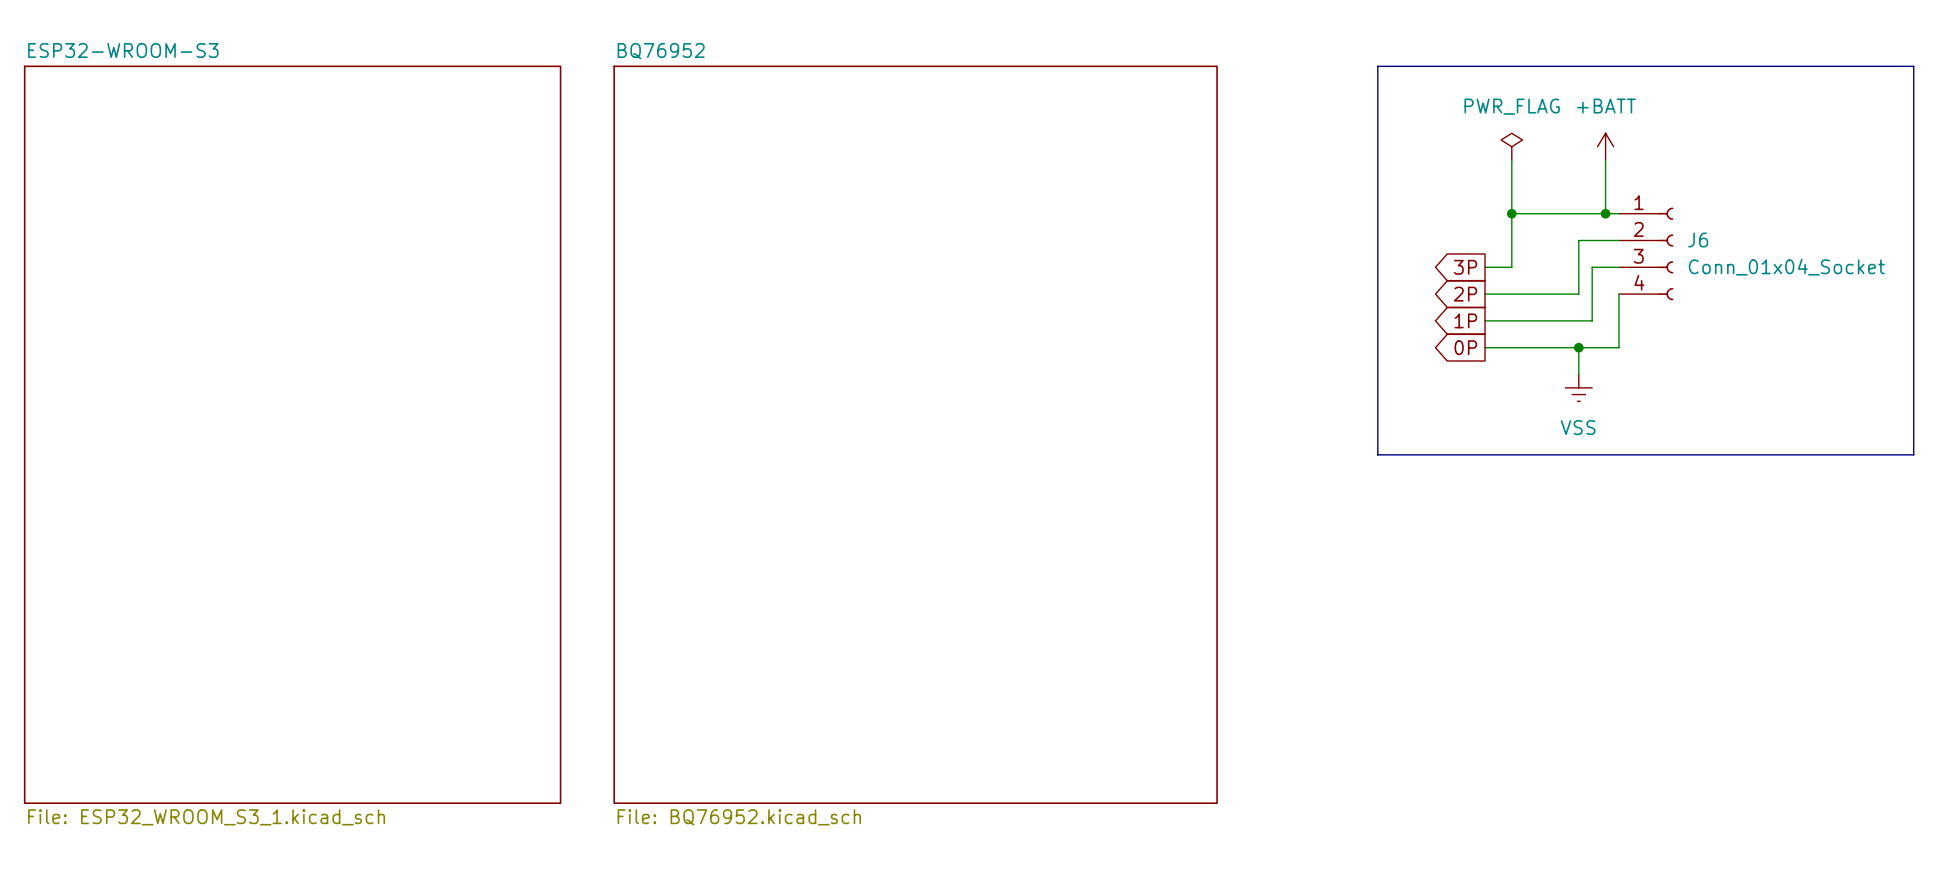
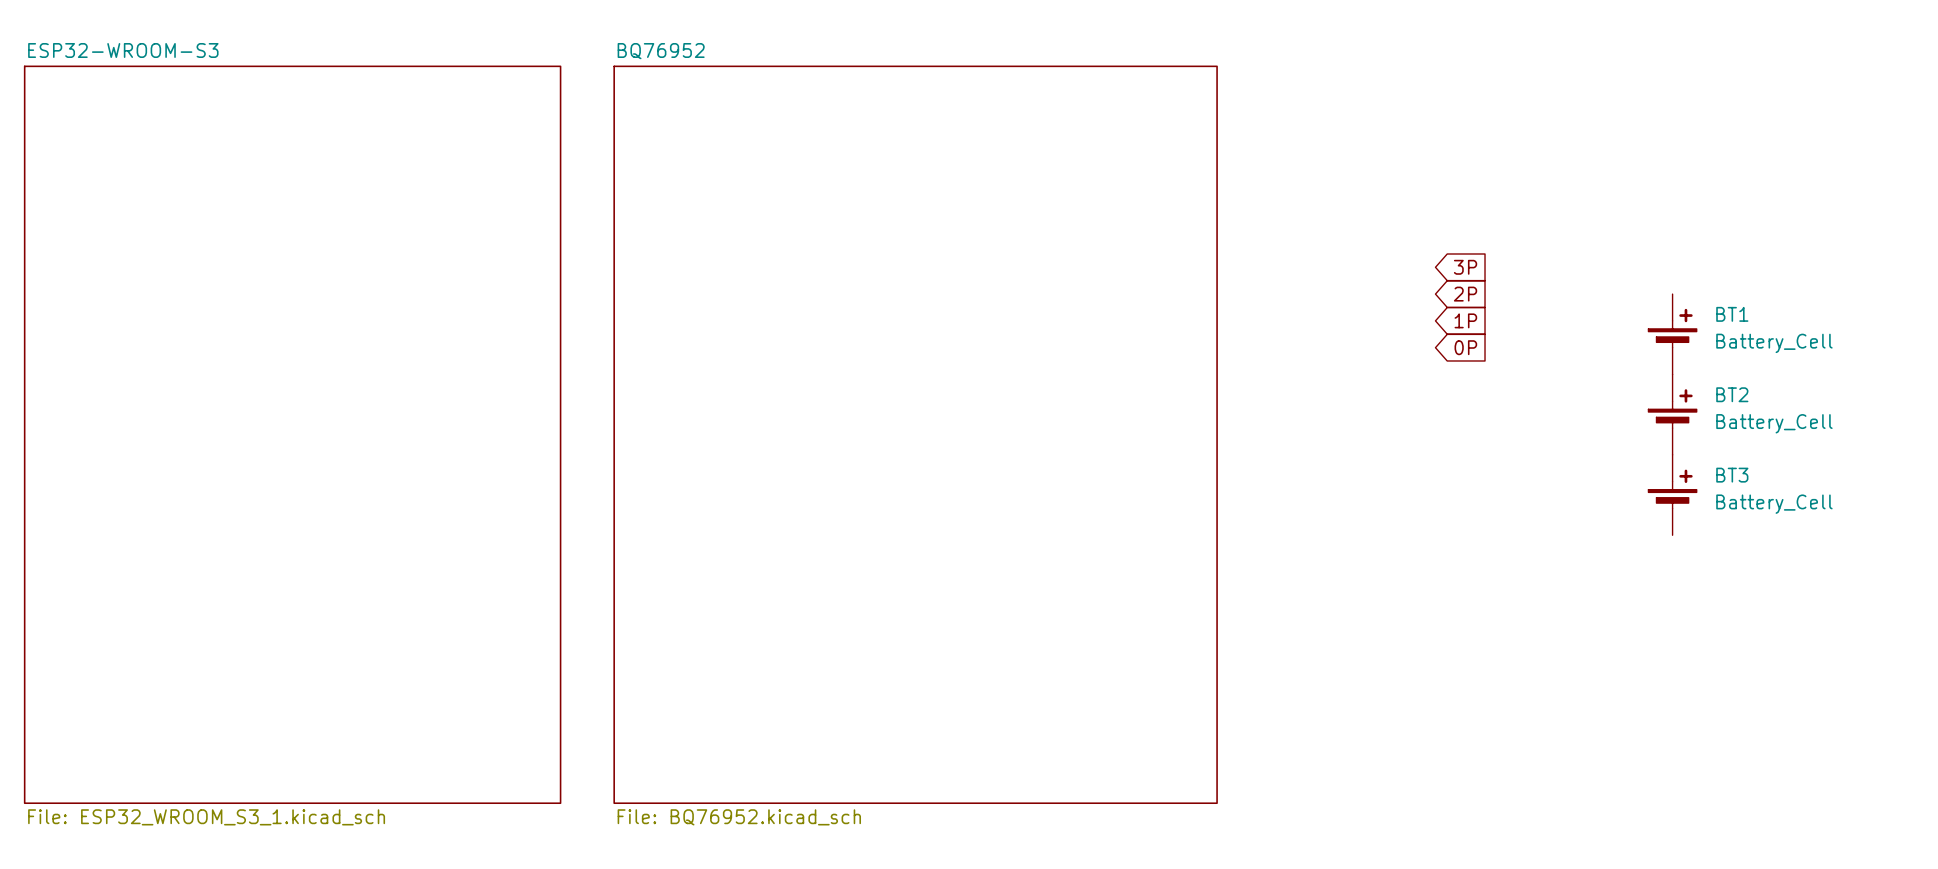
line: (1377, 66) (1913, 66) (1913, 454) (1377, 454) (1377, 66) -> none
power symbol: PWR_FLAG (1511, 146) -> none
power symbol: +BATT (1605, 146) -> none
wire: (1511, 160) (1511, 267) (1485, 267) -> none
wire: (1605, 160) (1605, 213) -> none
wire: (1511, 213) (1618, 213) -> none
junction: (1511, 213) -> none
junction: (1605, 213) -> none
wire: (1618, 240) (1578, 240) (1578, 294) (1485, 294) -> none
J6: Conn_01x04_Socket (1646, 253) -> none
wire: (1618, 267) (1592, 267) (1592, 320) (1485, 320) -> none
wire: (1618, 294) (1618, 347) (1485, 347) -> none
BT1: none -> Battery_Cell (1672, 334)
wire: (1578, 347) (1578, 374) -> none
junction: (1578, 347) -> none
power symbol: VSS (1578, 387) -> none
BT2: none -> Battery_Cell (1672, 414)
BT3: none -> Battery_Cell (1672, 495)

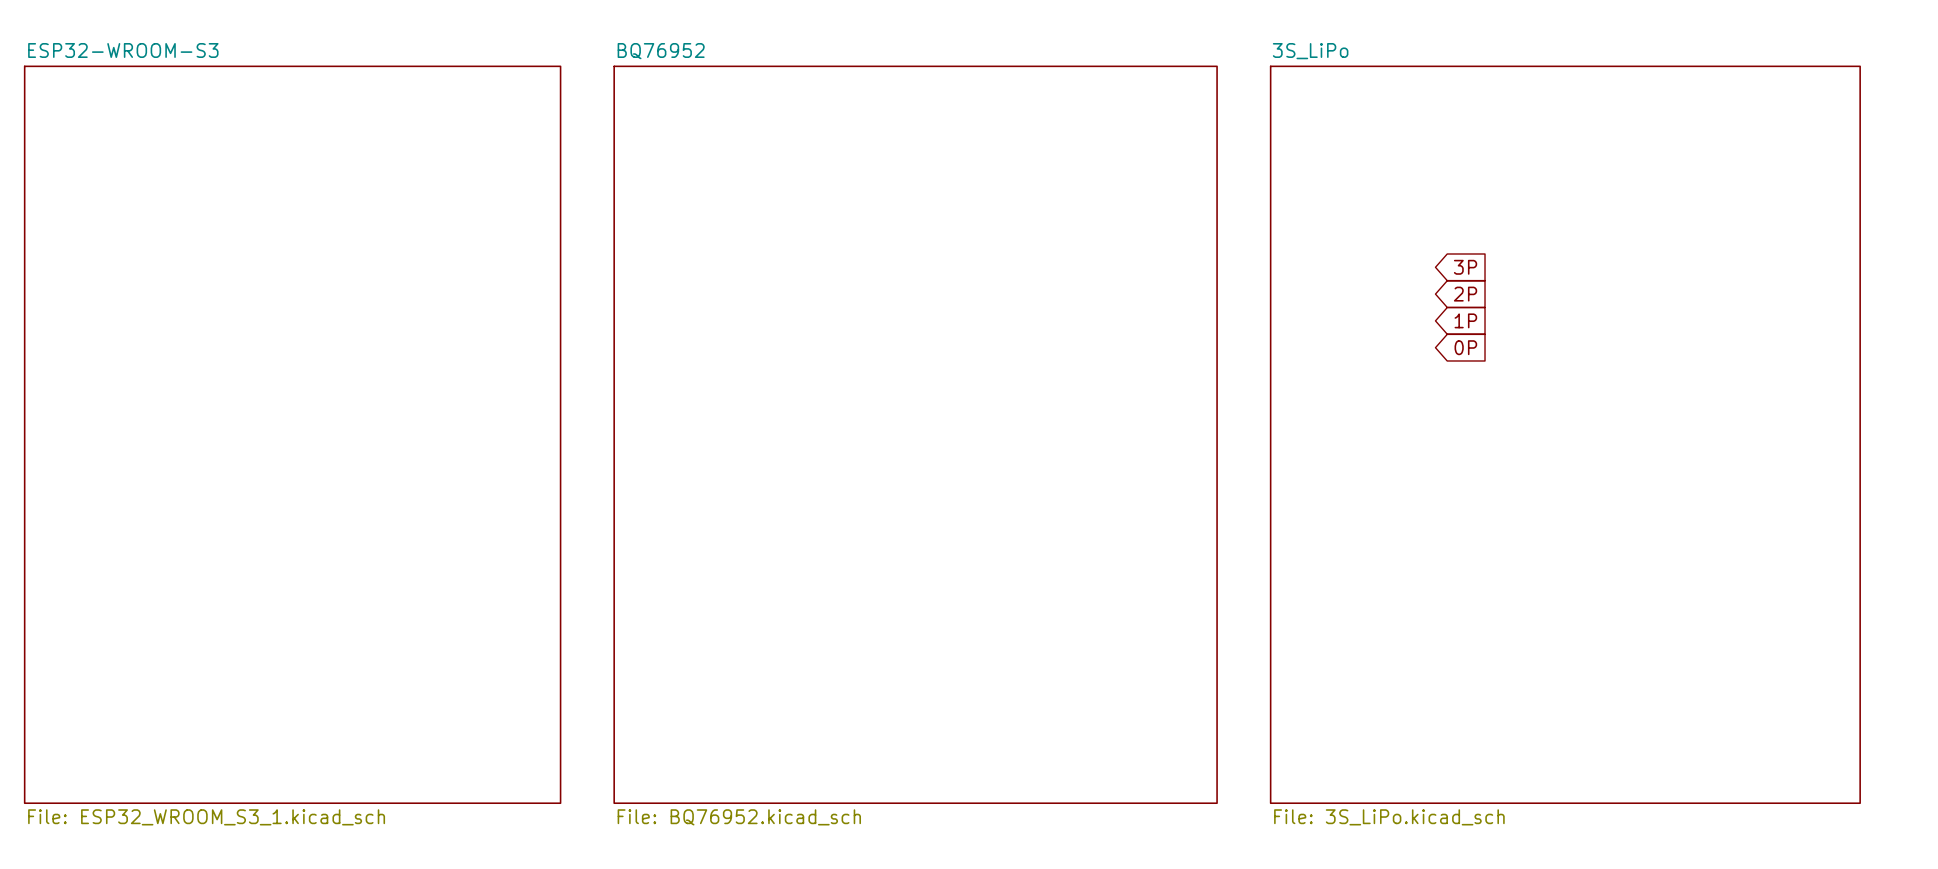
BT1: Battery_Cell (1672, 334) -> none
BT2: Battery_Cell (1672, 414) -> none
sheet 3S_LiPo: none -> File: 3S_LiPo.kicad_sch (1565, 434)
BT3: Battery_Cell (1672, 495) -> none

